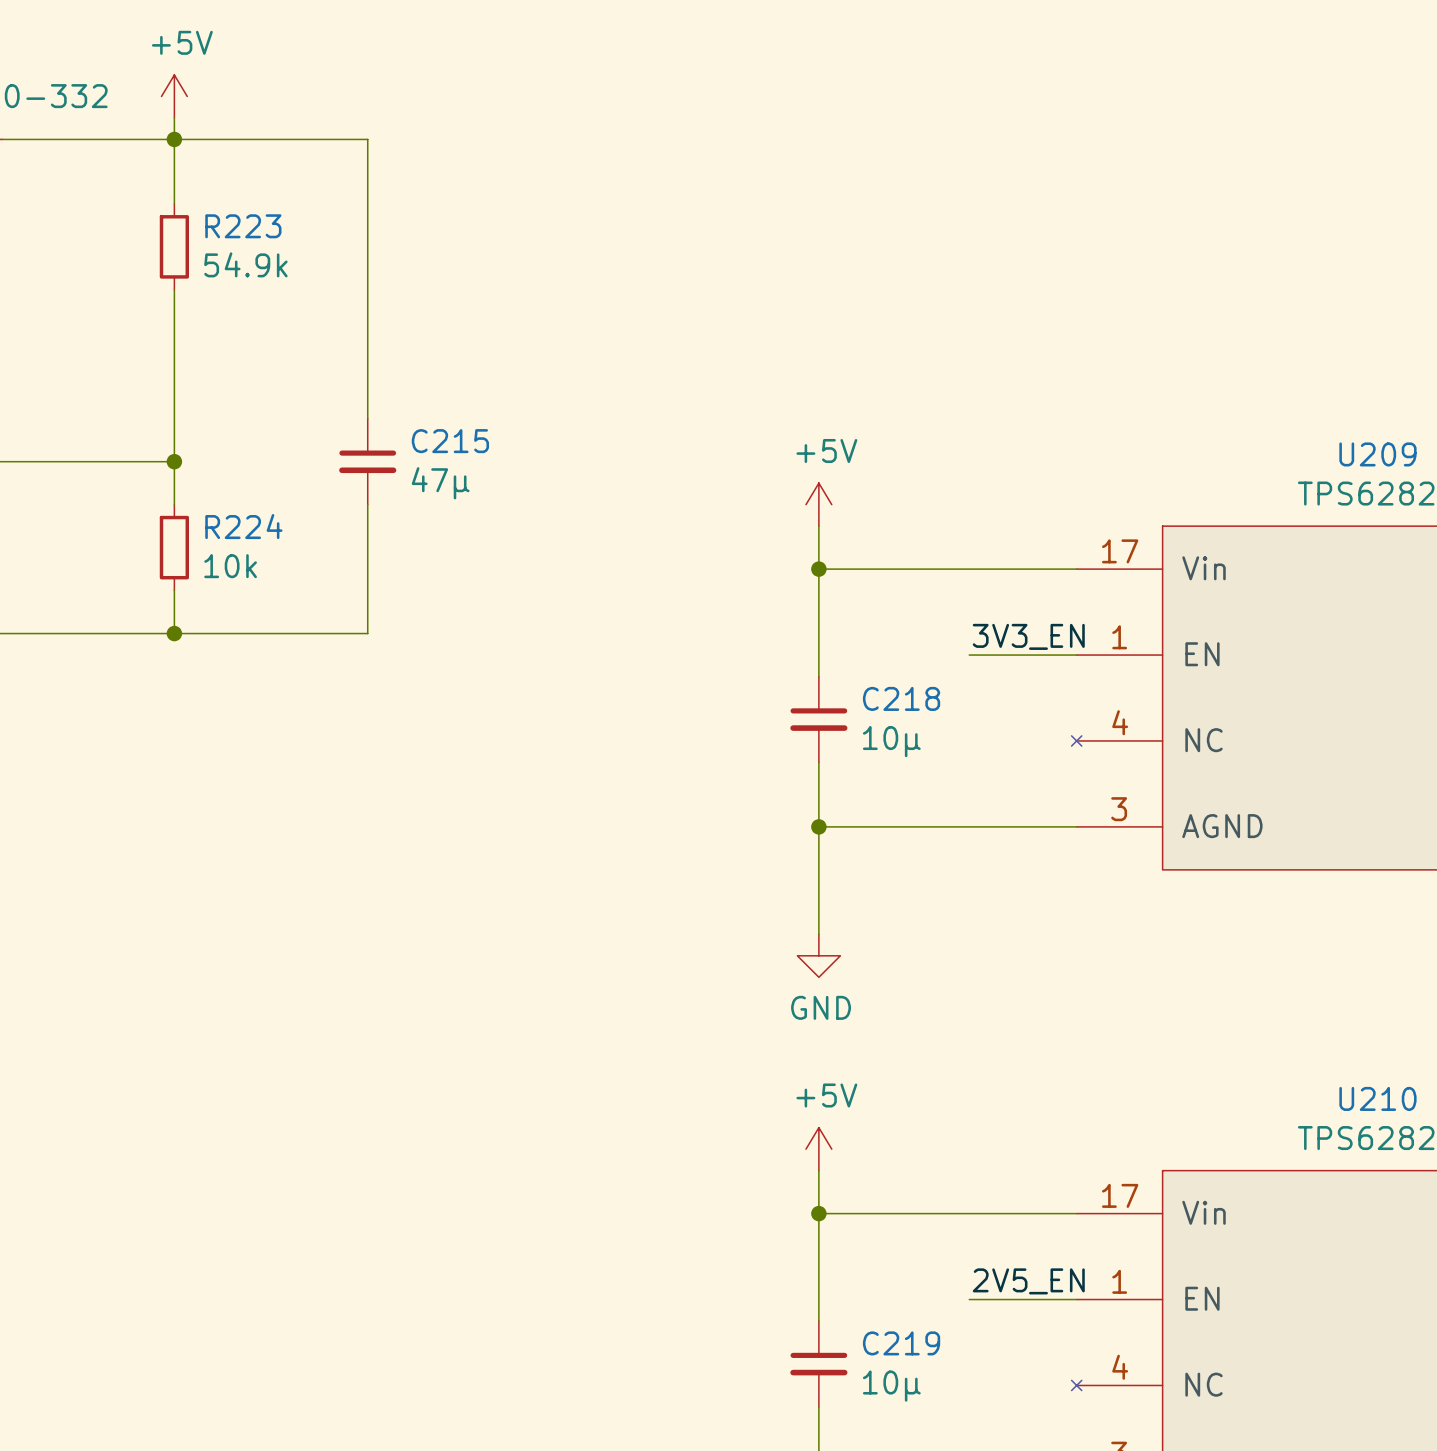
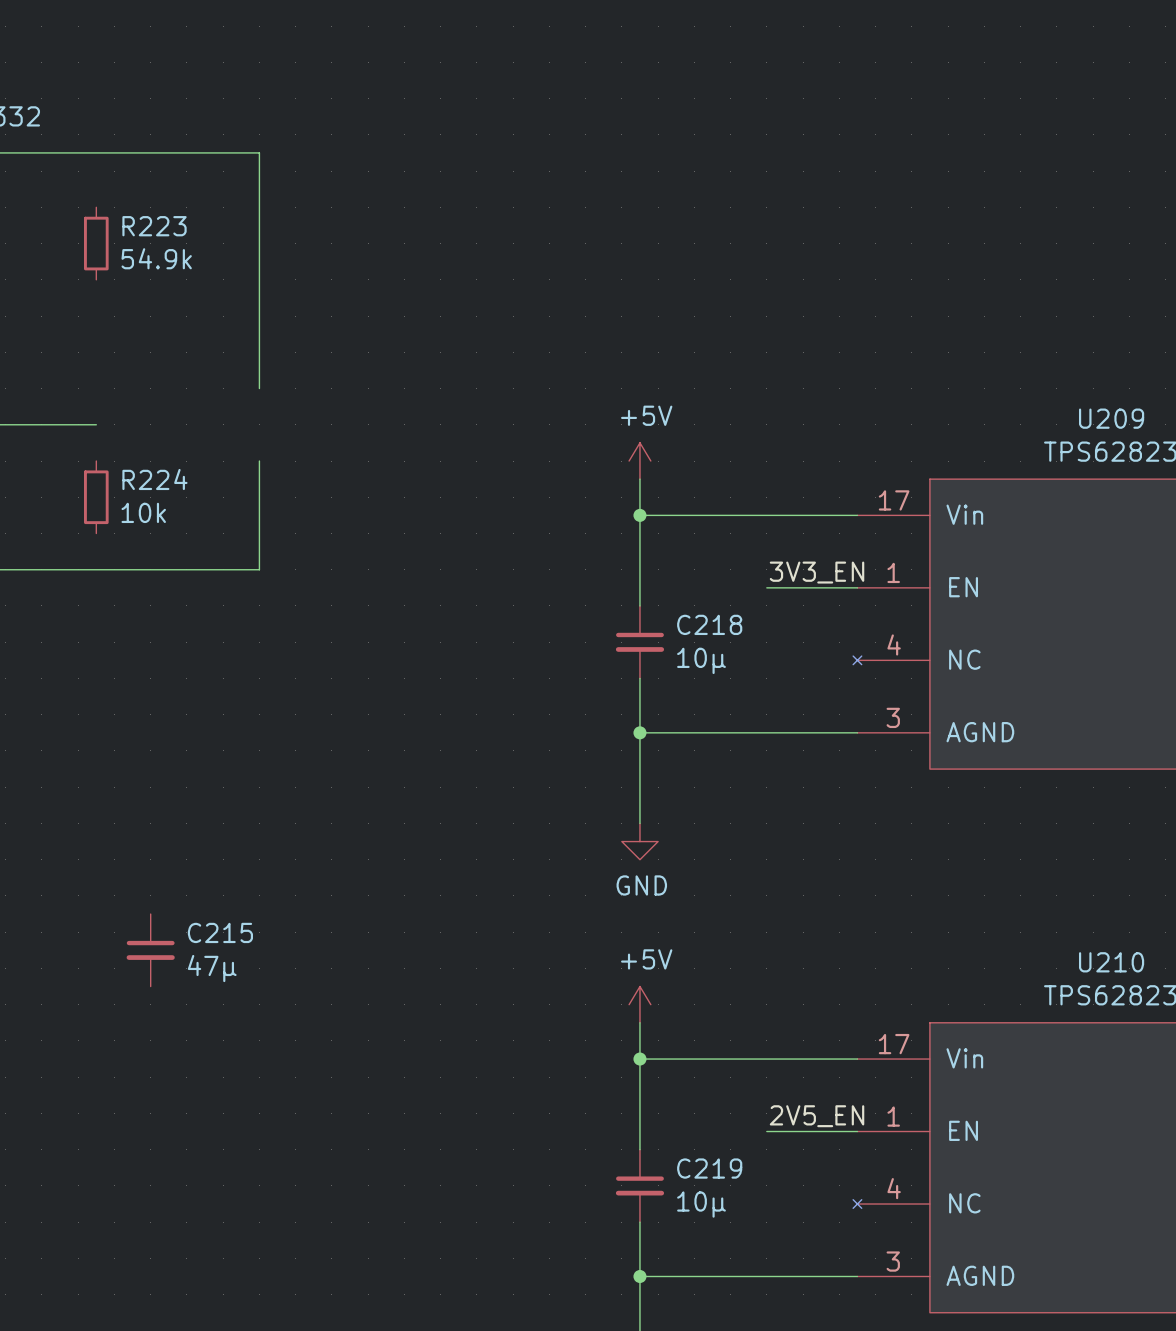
power symbol: +5V (174, 96) -> none
wire: (174, 117) (174, 203) -> none
junction: (174, 139) -> none
wire: (174, 289) (174, 504) -> none
junction: (174, 461) -> none
C215 position: (367, 461) -> (150, 950)
wire: (174, 590) (174, 633) -> none
junction: (174, 633) -> none

